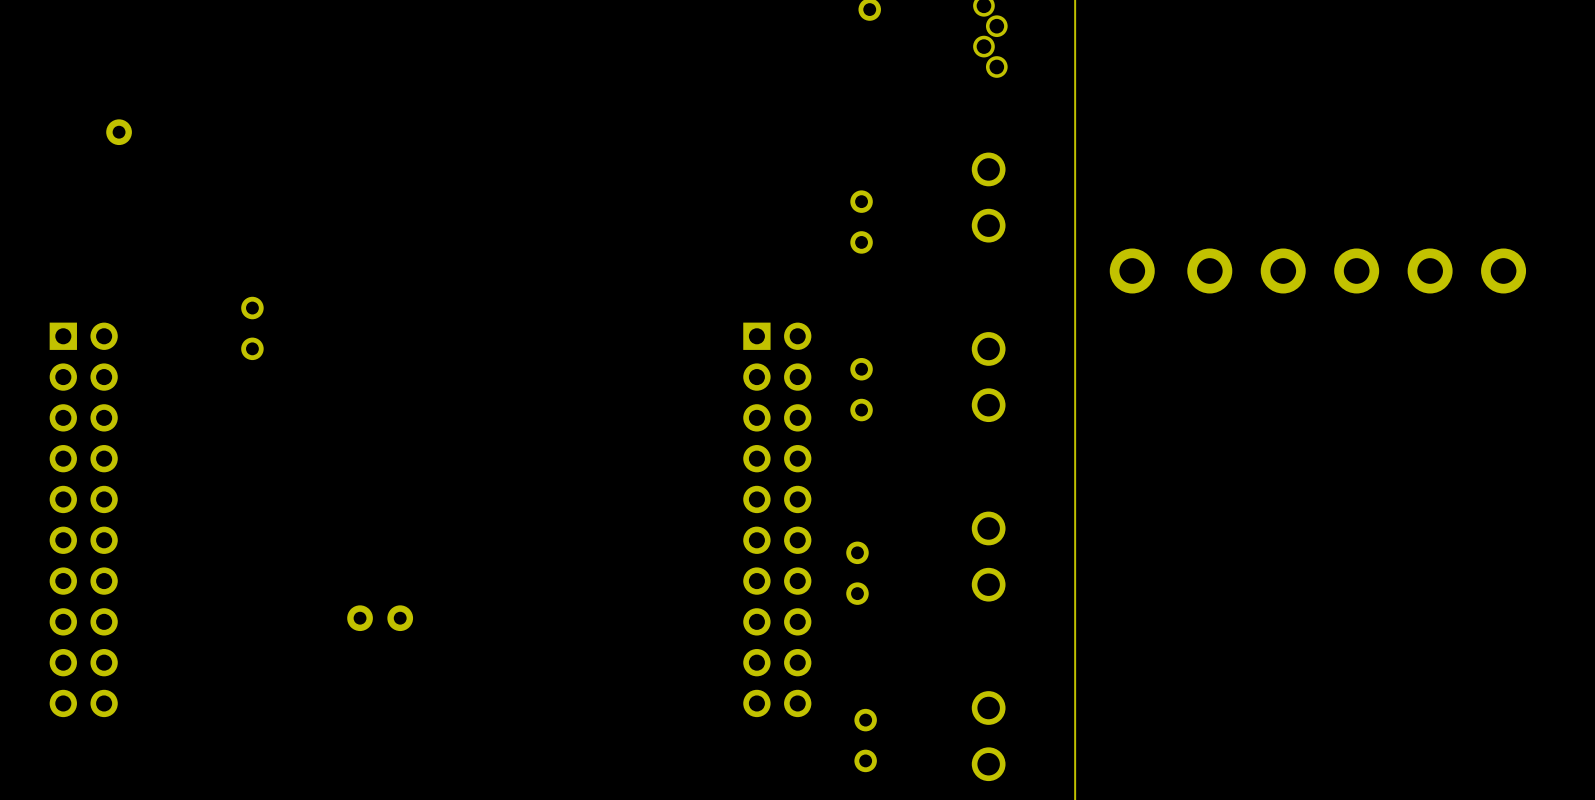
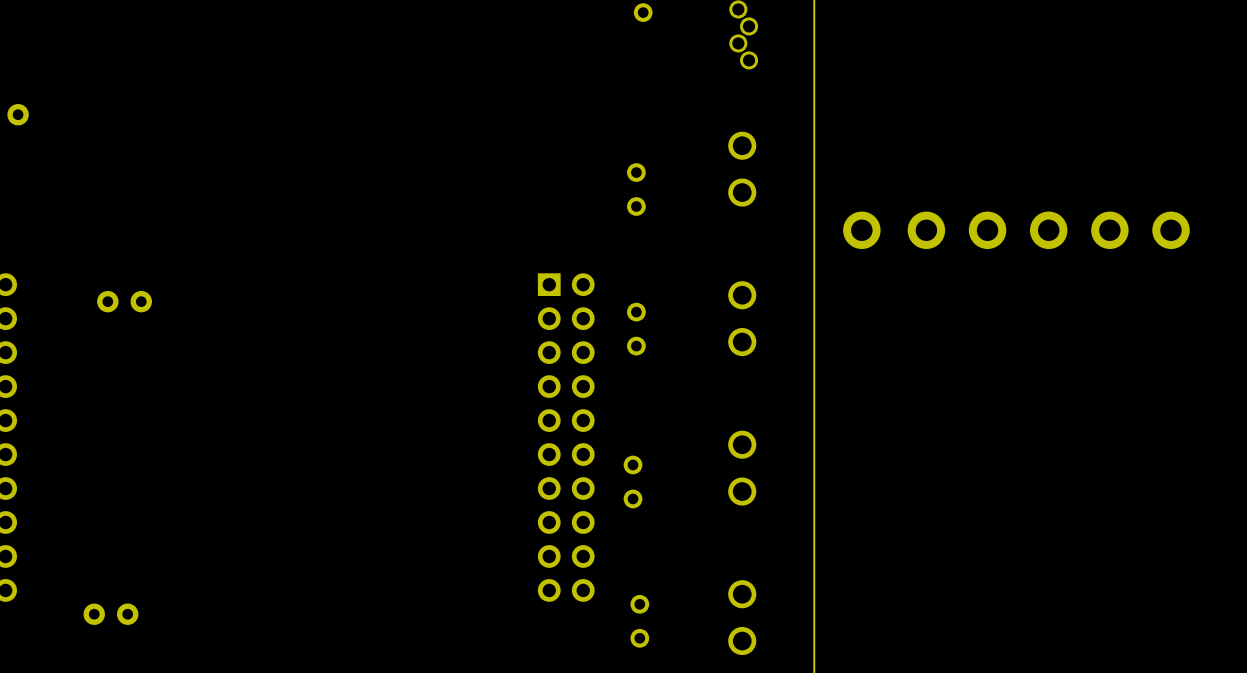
part: (252, 328) -> none
part: none -> (124, 301)
part: (380, 618) -> none
part: none -> (110, 614)

